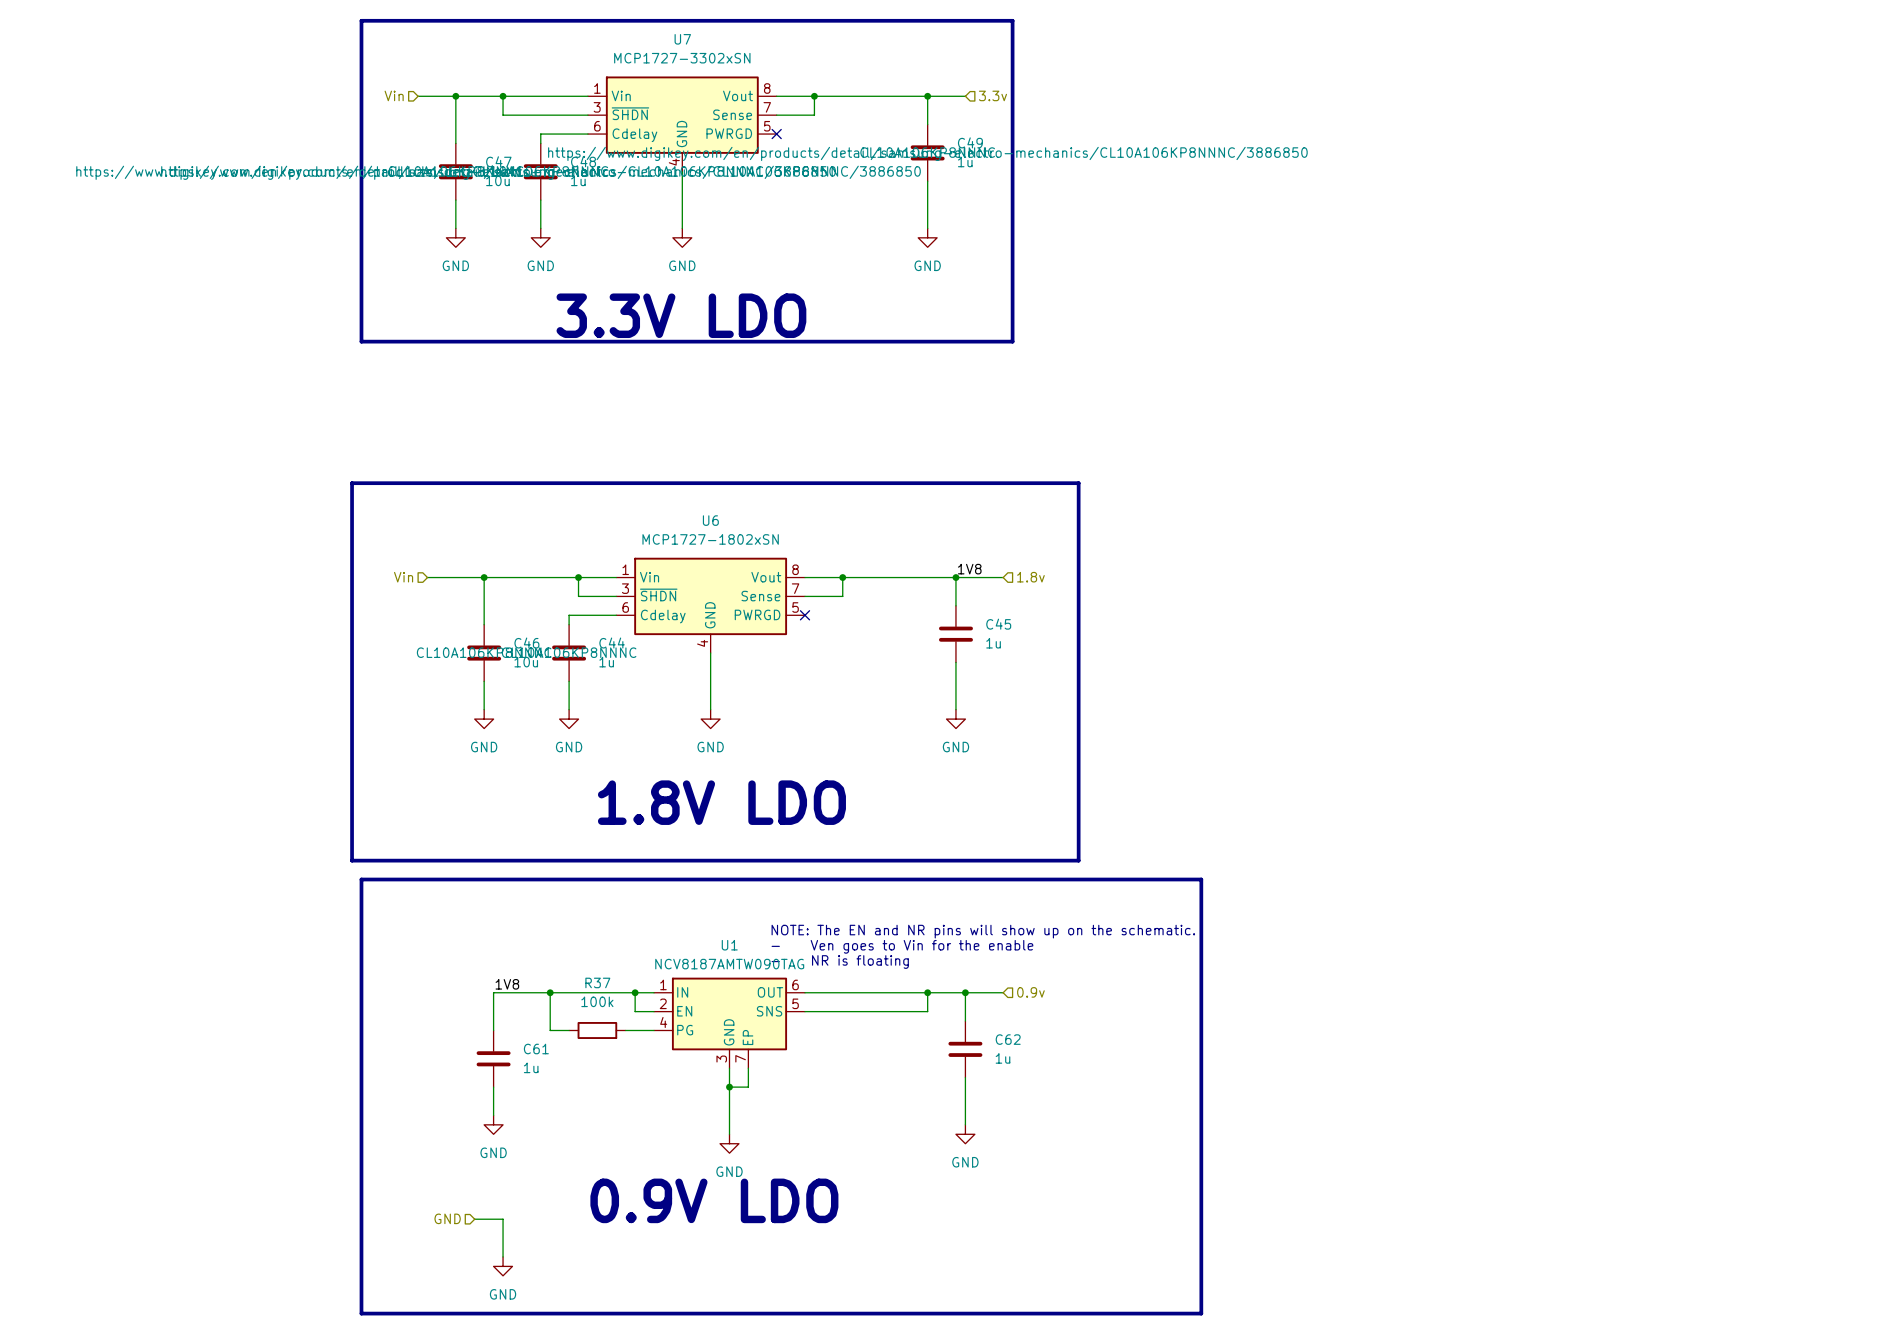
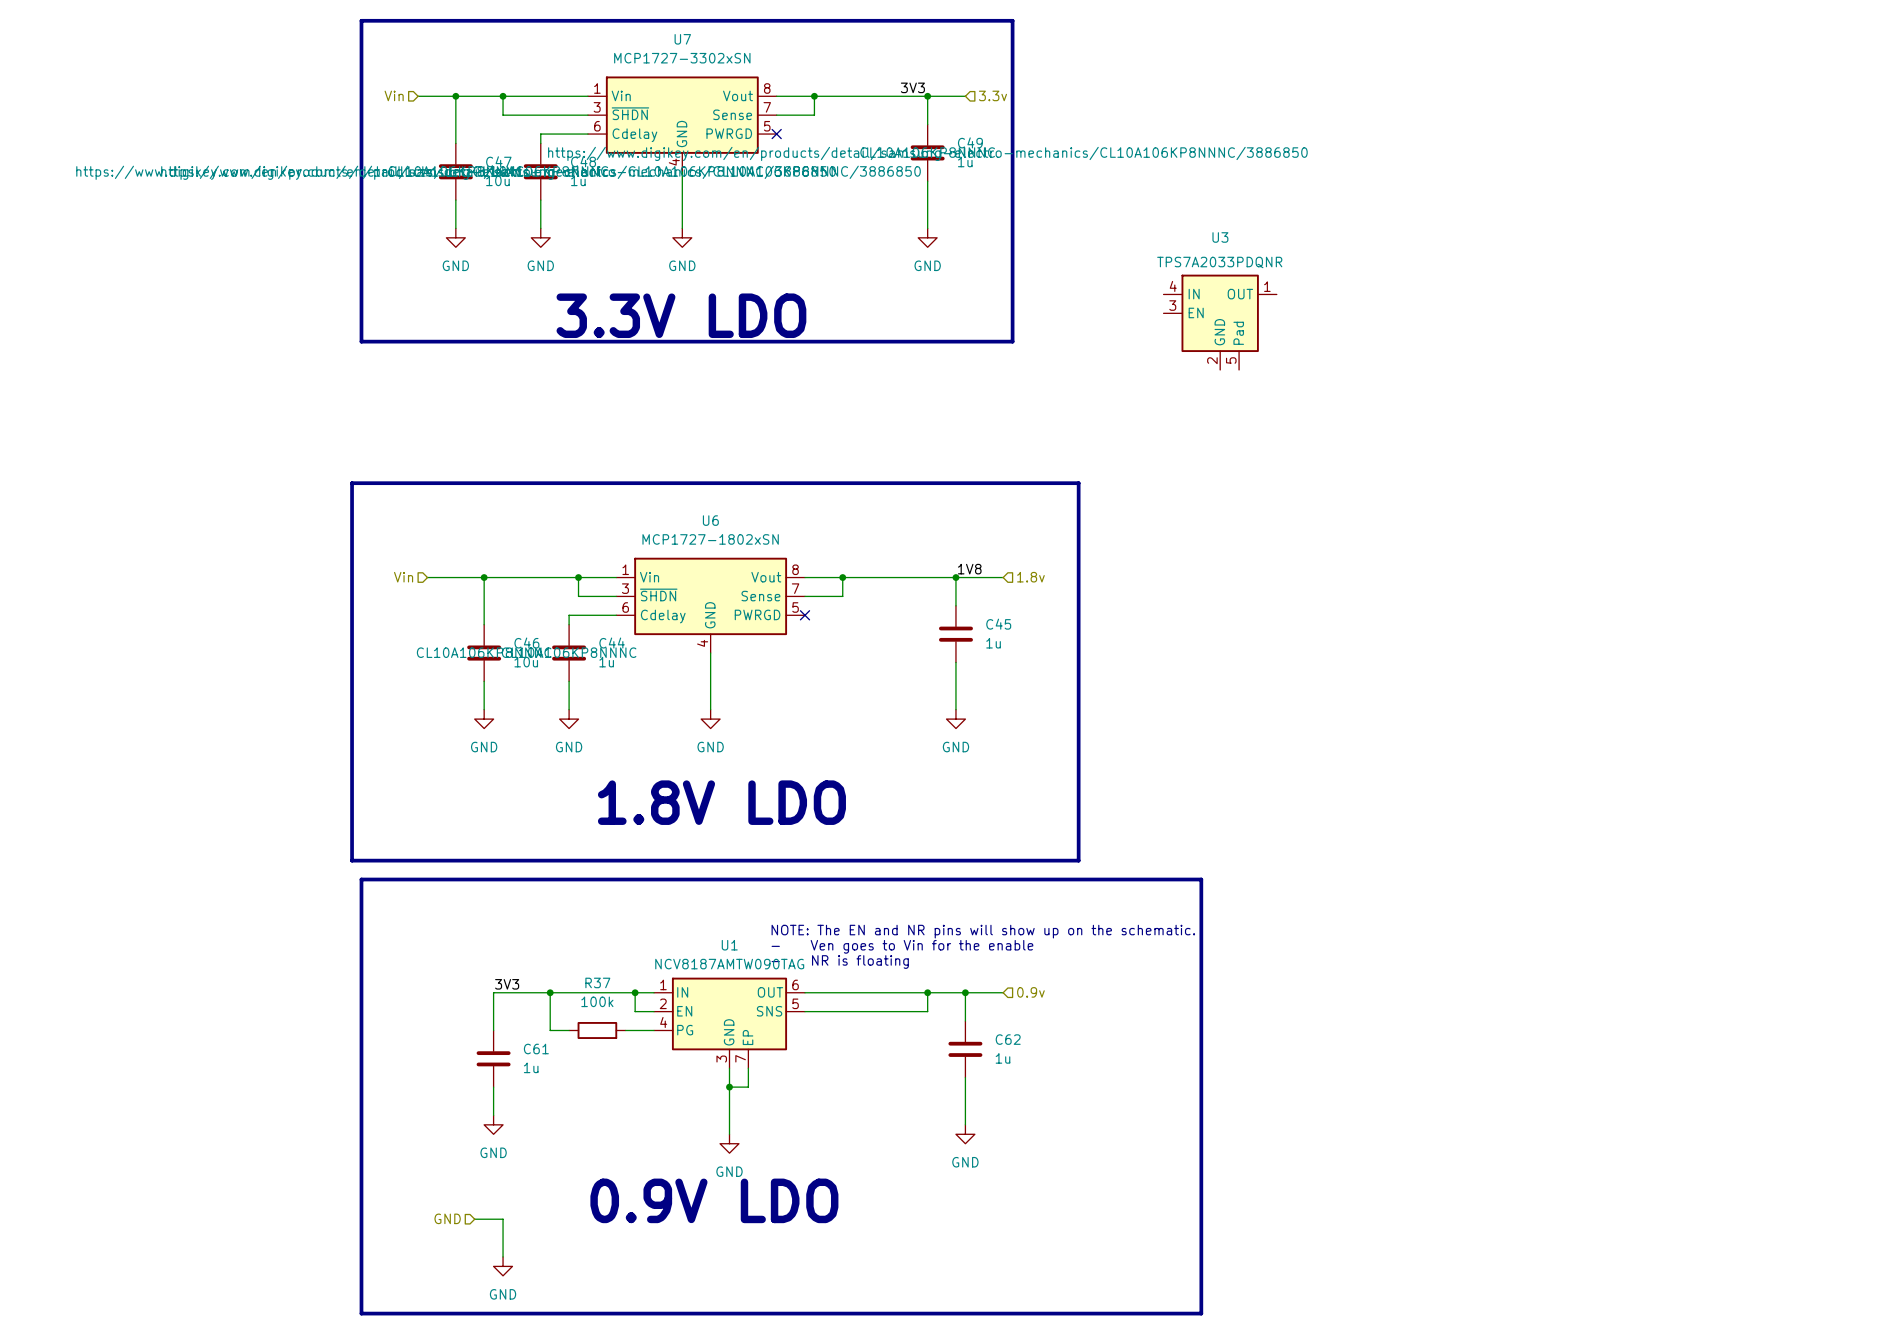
label: none -> 3V3 (912, 87)
U3: none -> (1220, 322)
label: 1V8 (507, 984) -> 3V3 (507, 984)

